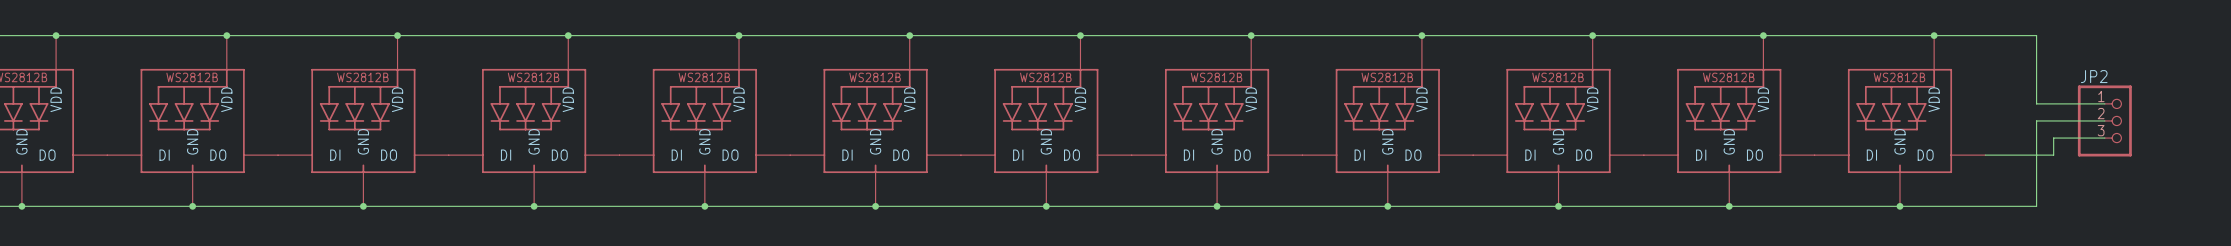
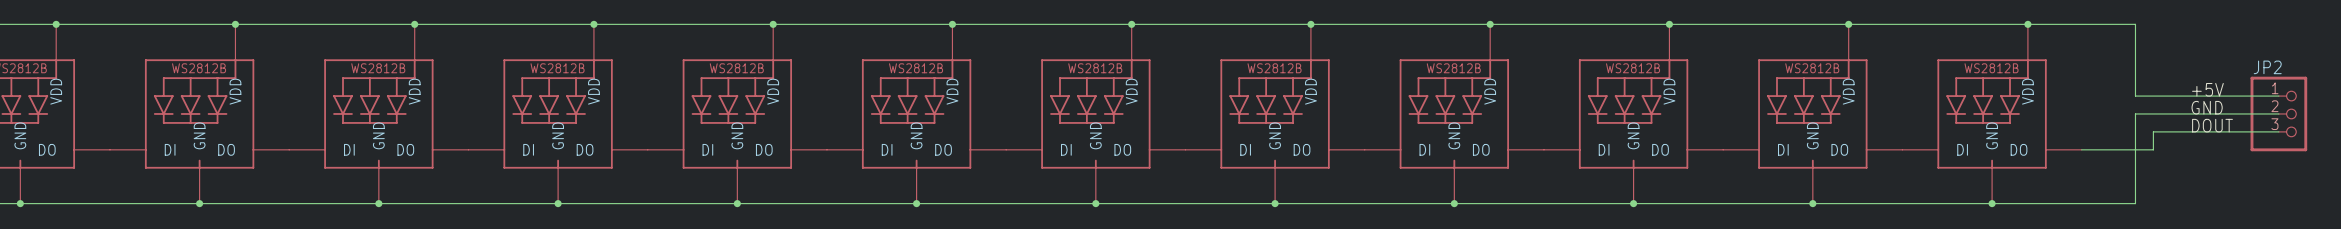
label: none -> +5V (2207, 89)
wire: none -> (2207, 96) (2278, 96)
label: none -> GND (2207, 107)
wire: none -> (2207, 113) (2278, 113)
JP2 position: (2104, 120) -> (2278, 113)
label: none -> DOUT (2212, 125)
wire: none -> (2207, 131) (2278, 131)

